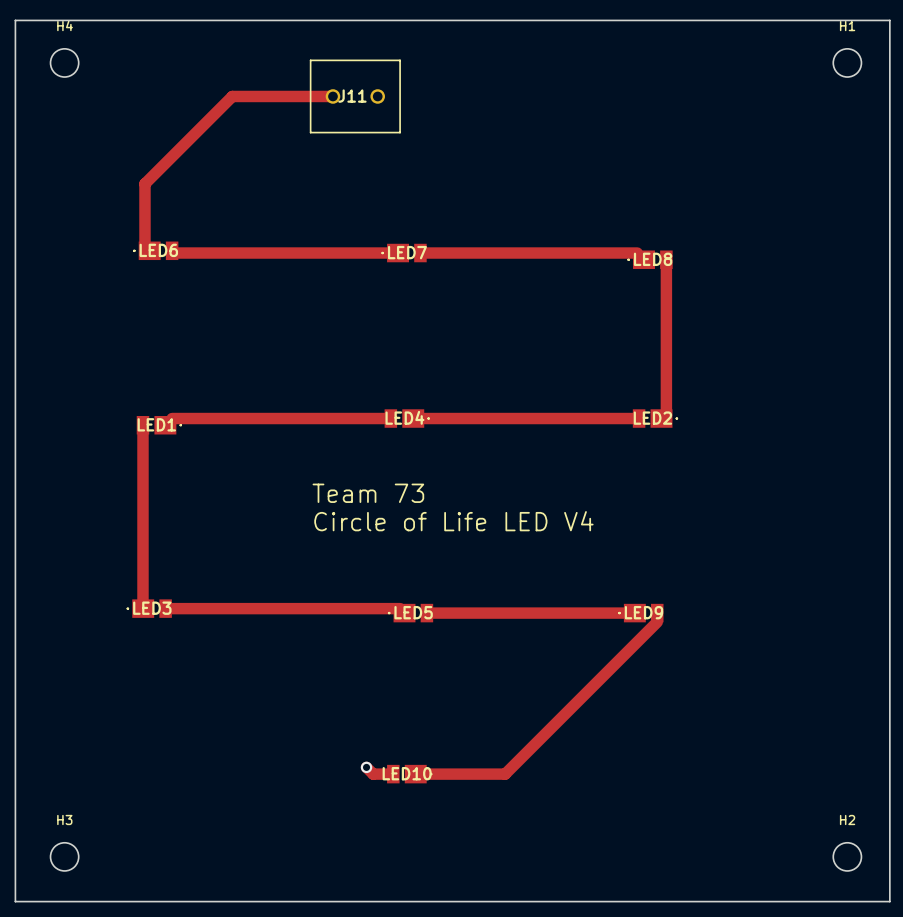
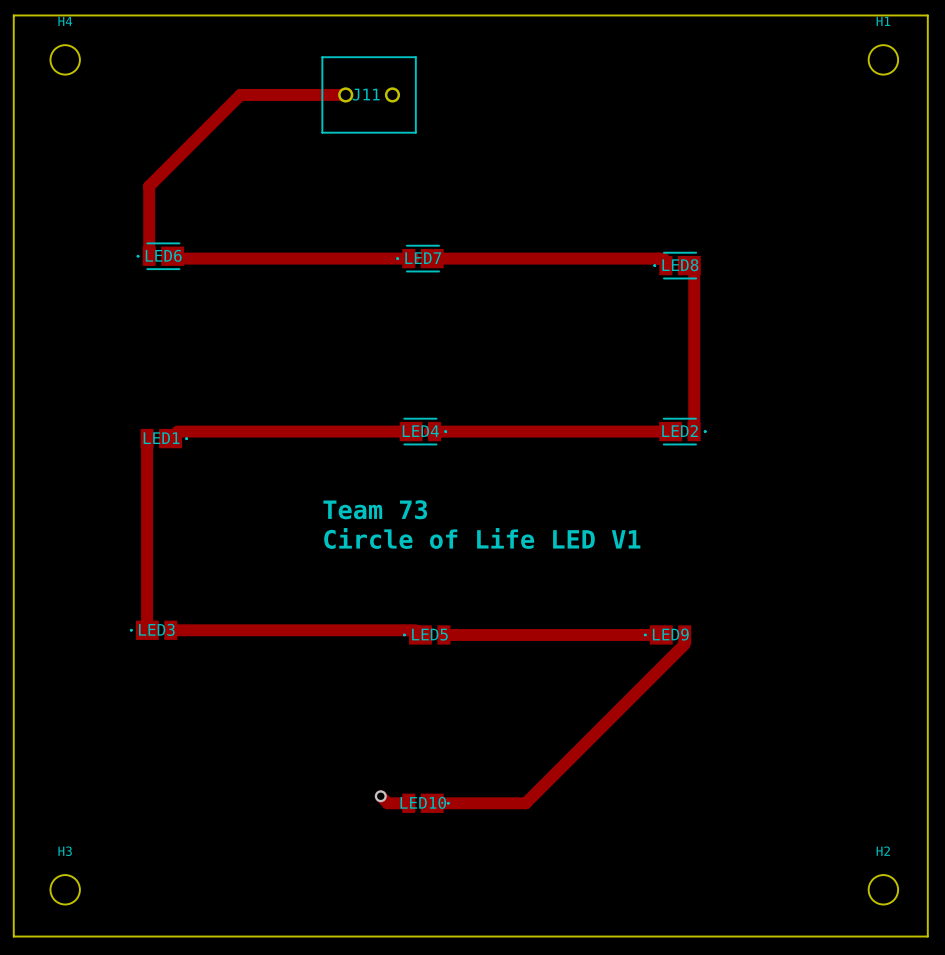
LED6 footprint: [133, 241, 179, 261] -> [137, 242, 185, 271]
LED7 footprint: [381, 243, 427, 263] -> [396, 244, 444, 273]
LED8 footprint: [627, 250, 673, 269] -> [653, 251, 701, 280]
LED4 footprint: [384, 409, 430, 428] -> [399, 417, 447, 446]
LED2 footprint: [632, 409, 678, 428] -> [659, 417, 707, 446]
text: Circle of Life LED V4 (453, 521) -> Circle of Life LED V1 (482, 538)

